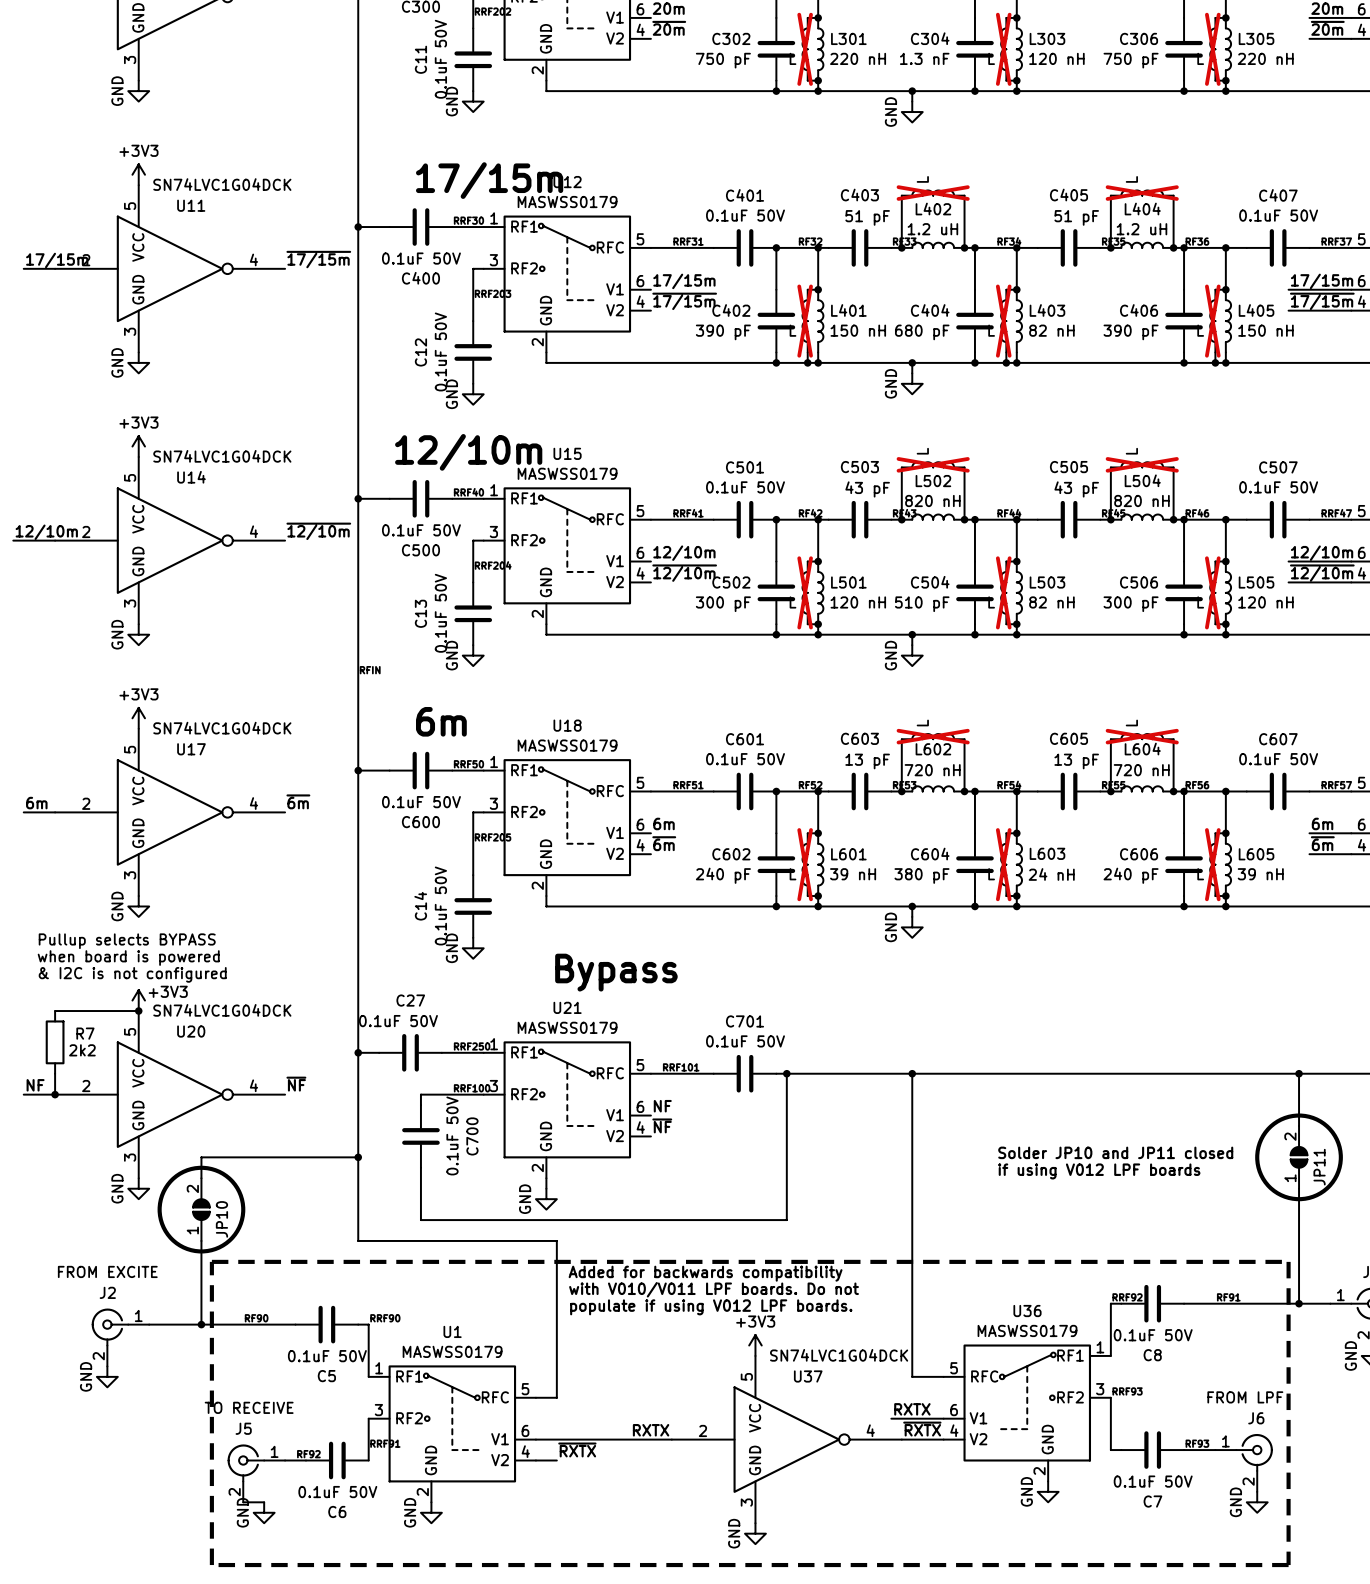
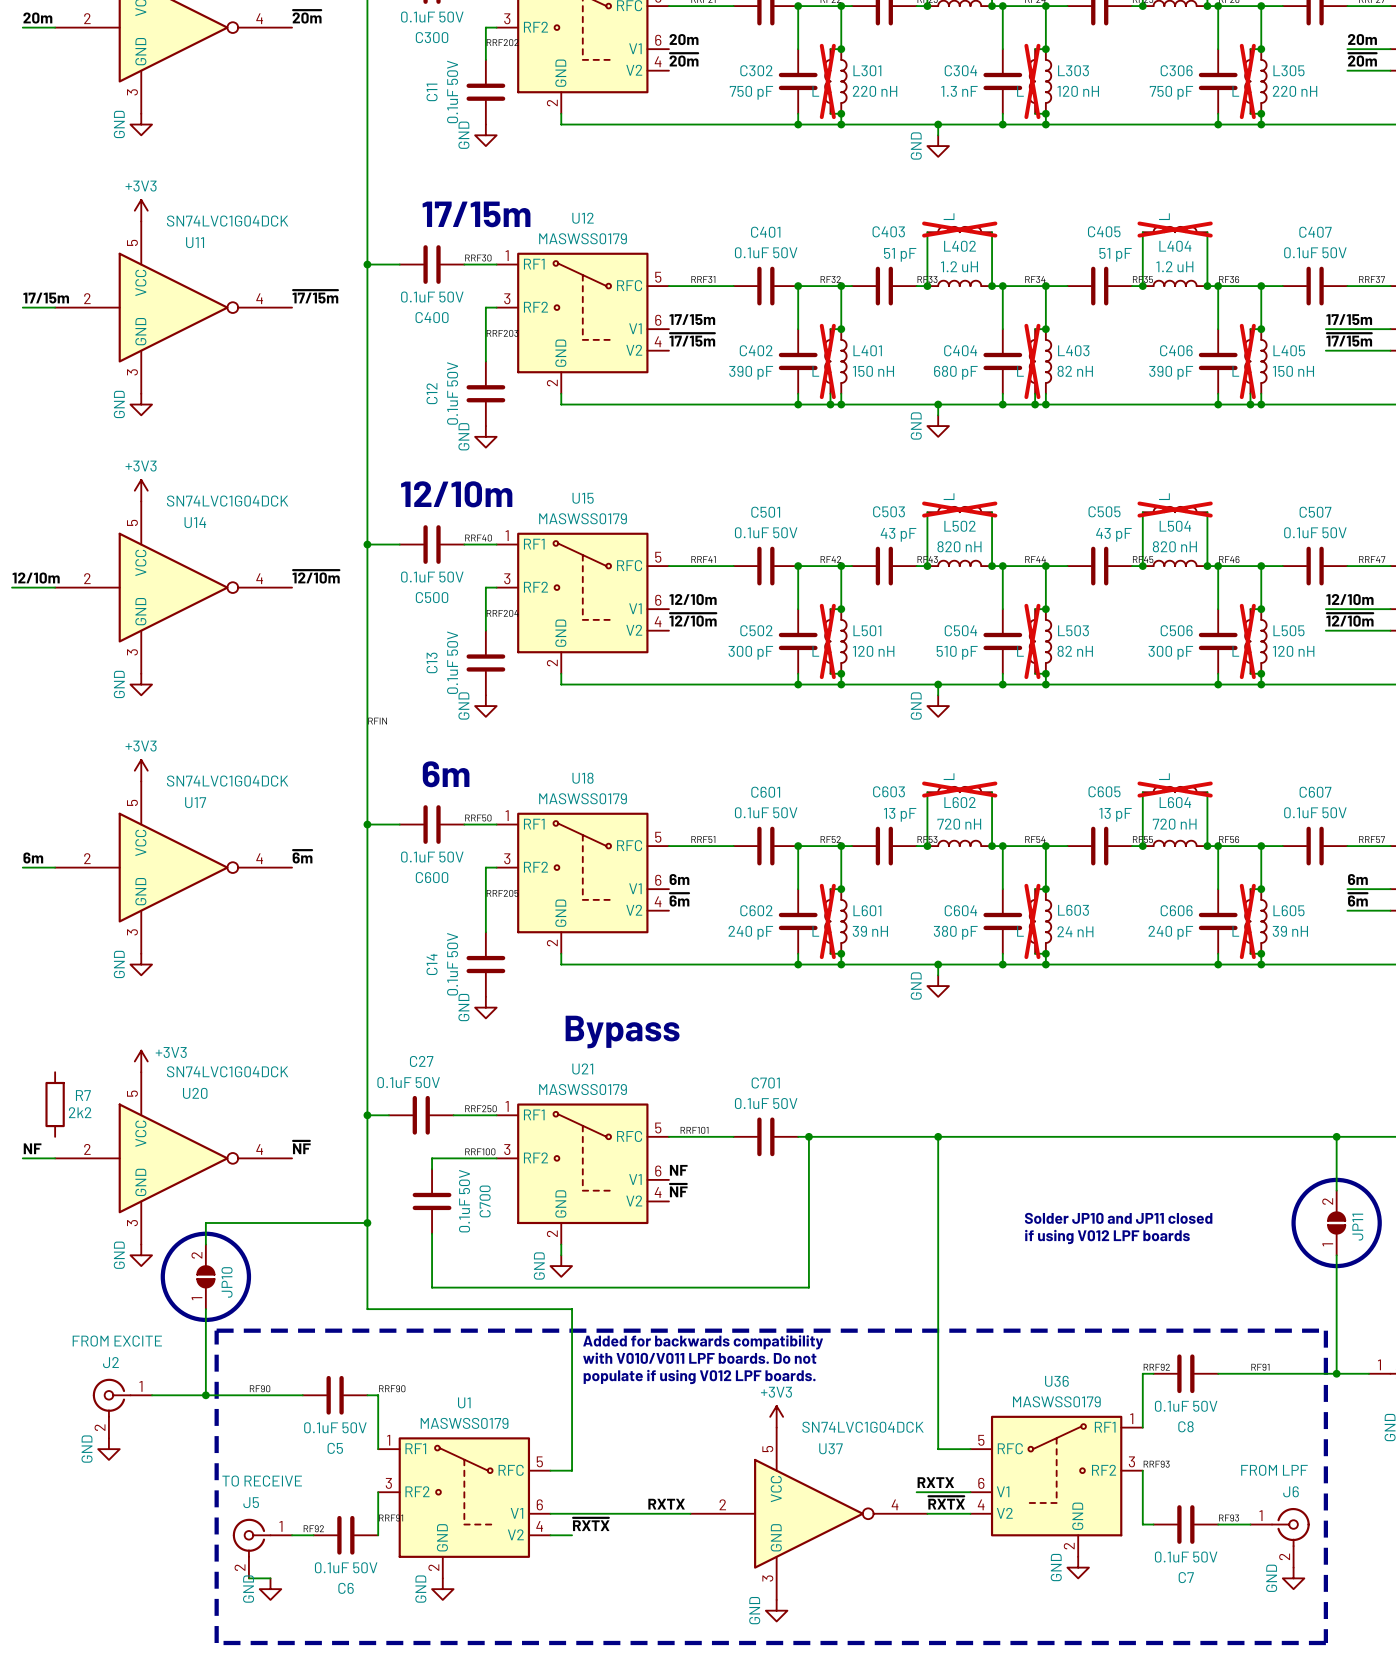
text: Pullup selects BYPASS (127, 941) -> none
text: when board is powered (128, 958) -> none
text: & I2C is not configured (132, 974) -> none
wire: (55, 1011) (138, 1011) -> none
junction: (138, 1011) -> none
wire: (55, 1073) (55, 1094) -> none
junction: (55, 1094) -> none

